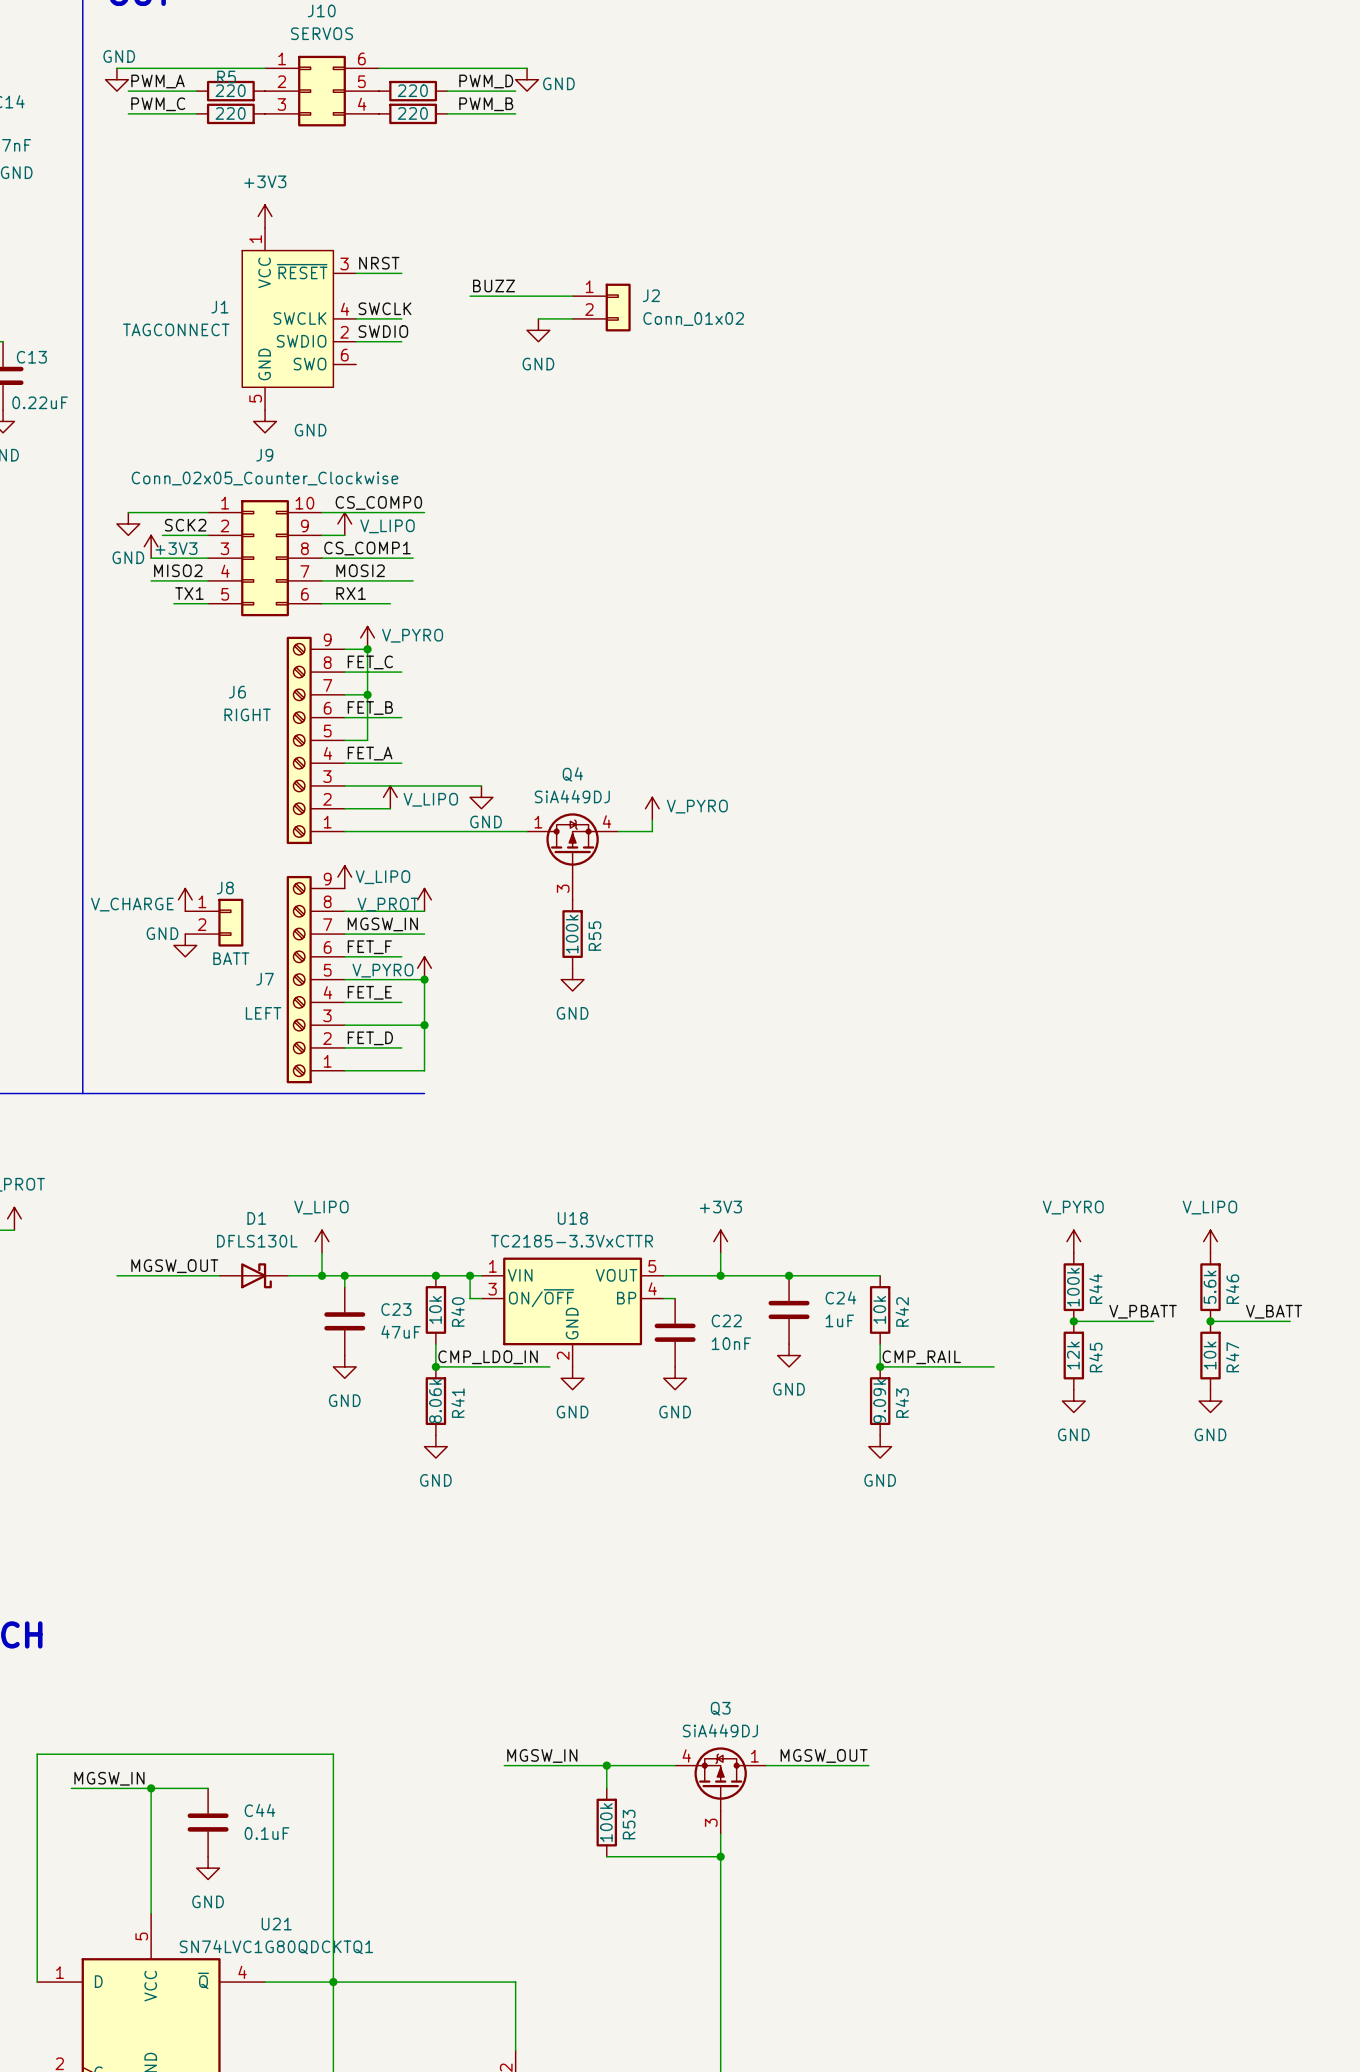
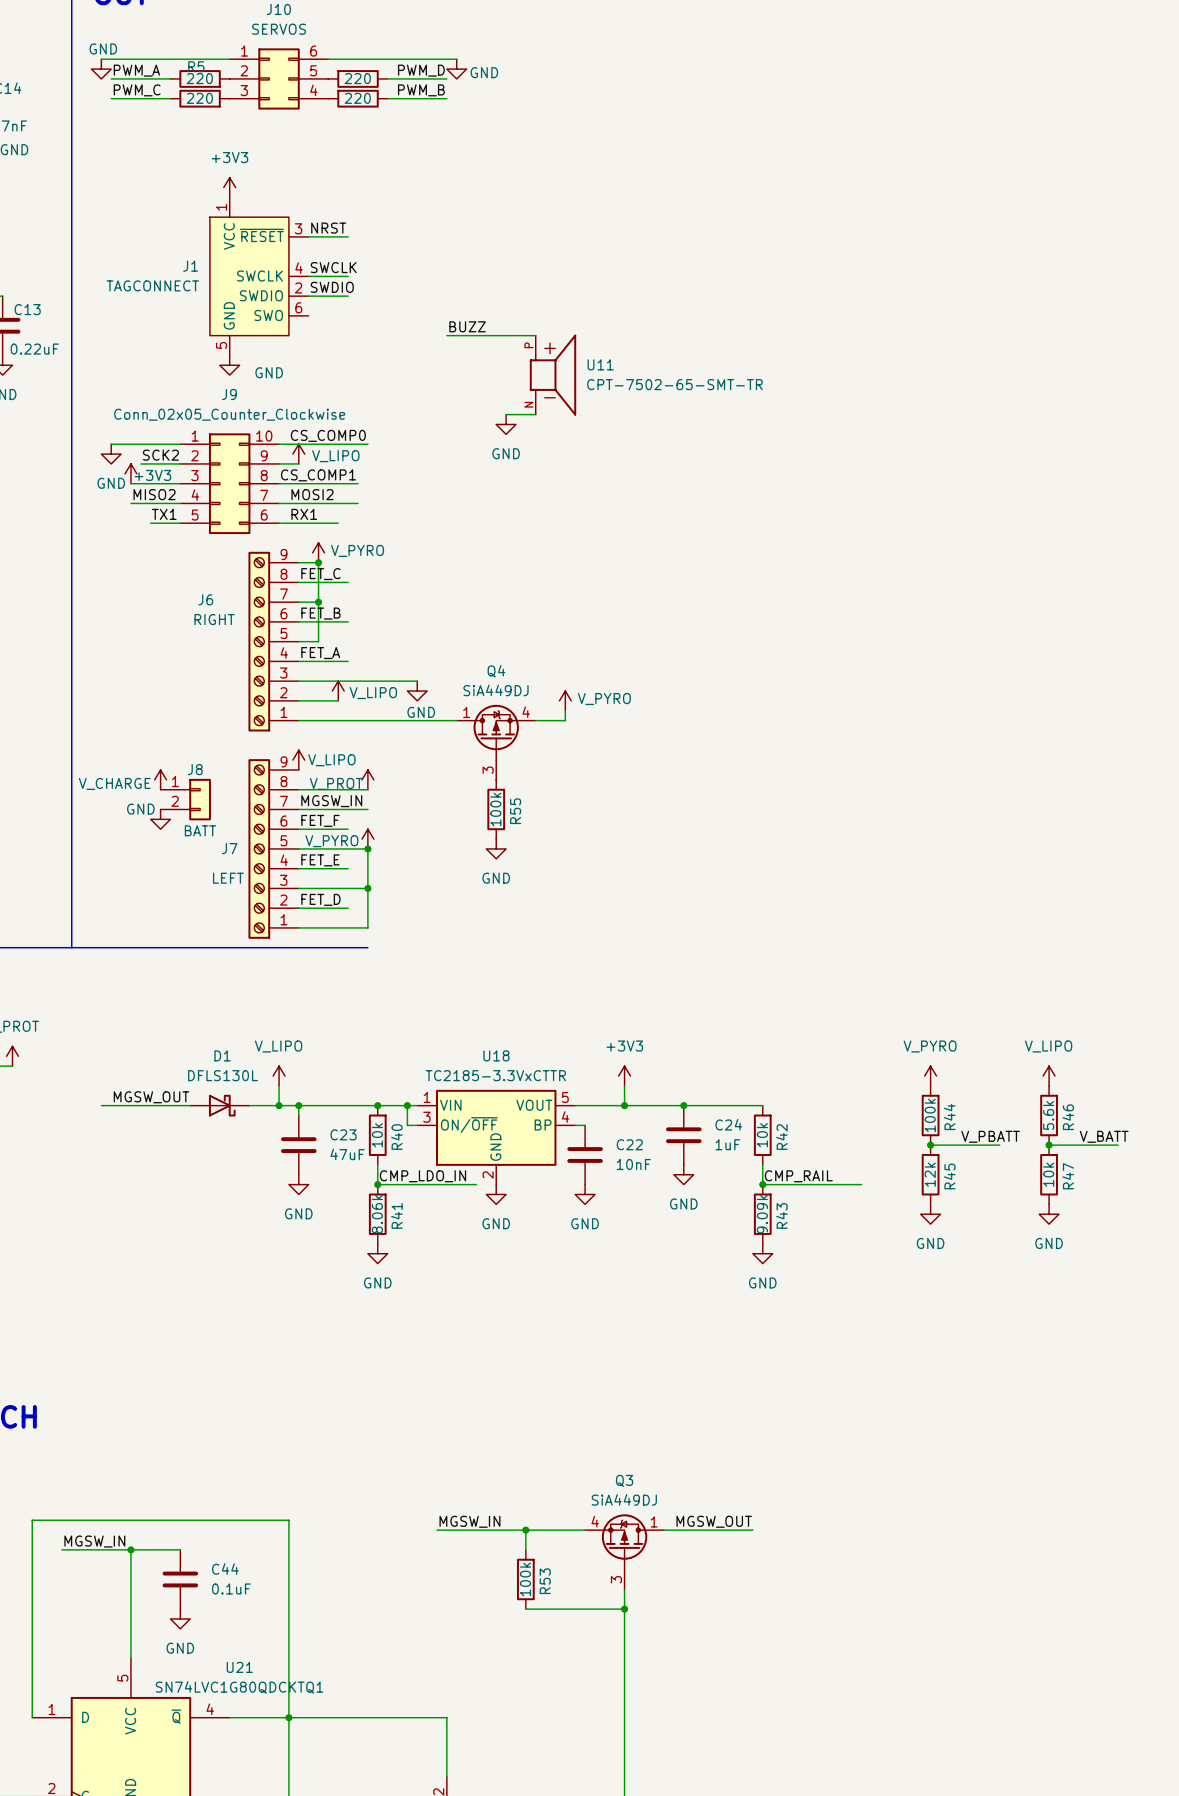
label position: BUZZ (494, 285) -> BUZZ (467, 326)
wire: (470, 296) (572, 296) -> (446, 335) (535, 335)
J2: Conn_01x02 (601, 307) -> none
wire: (538, 318) (572, 318) -> (506, 414) (535, 414)
power symbol position: GND (538, 330) -> GND (506, 424)
U11: none -> CPT-7502-65-SMT-TR (552, 375)

